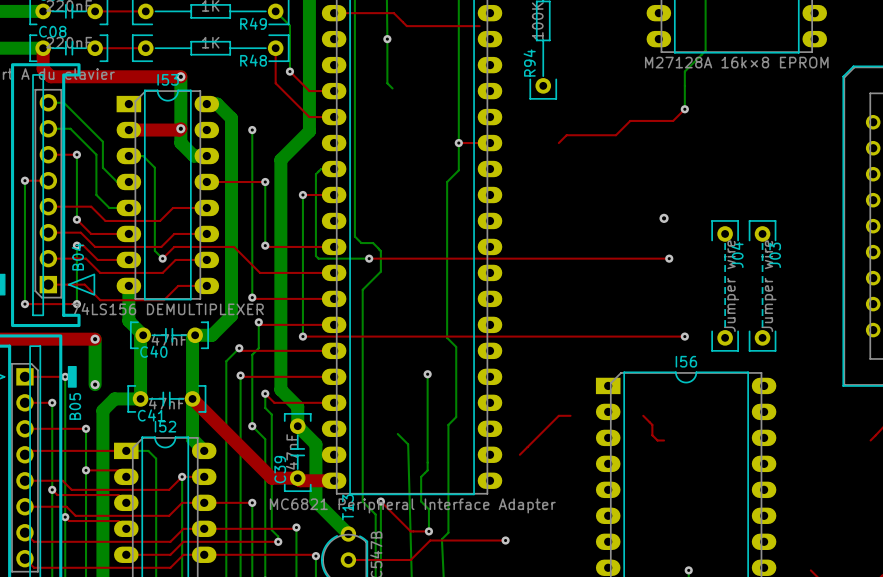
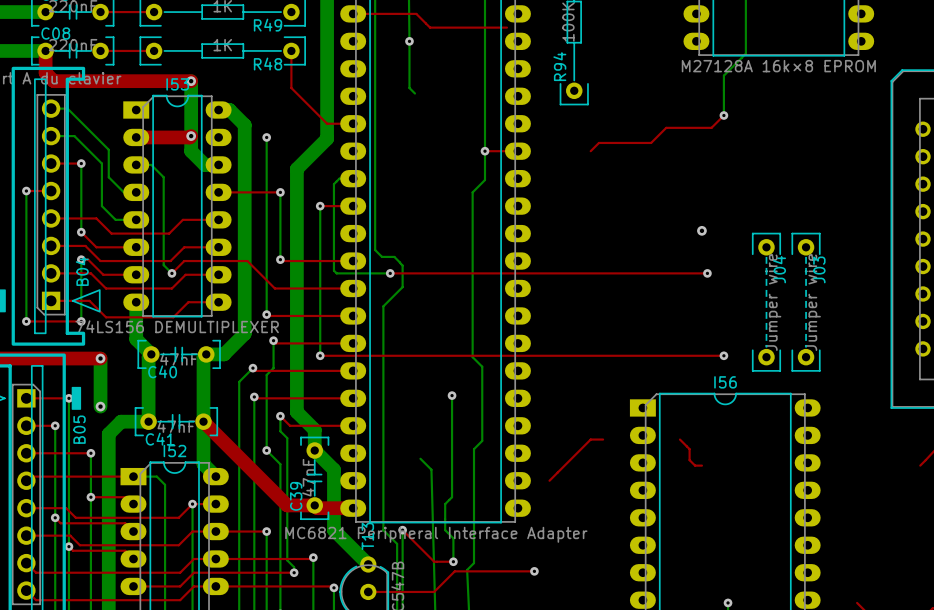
bottom track: (275, 11) (289, 25) (289, 71) -> none
top track: (289, 71) (309, 91) (334, 91) -> none
via: (289, 71) -> none

